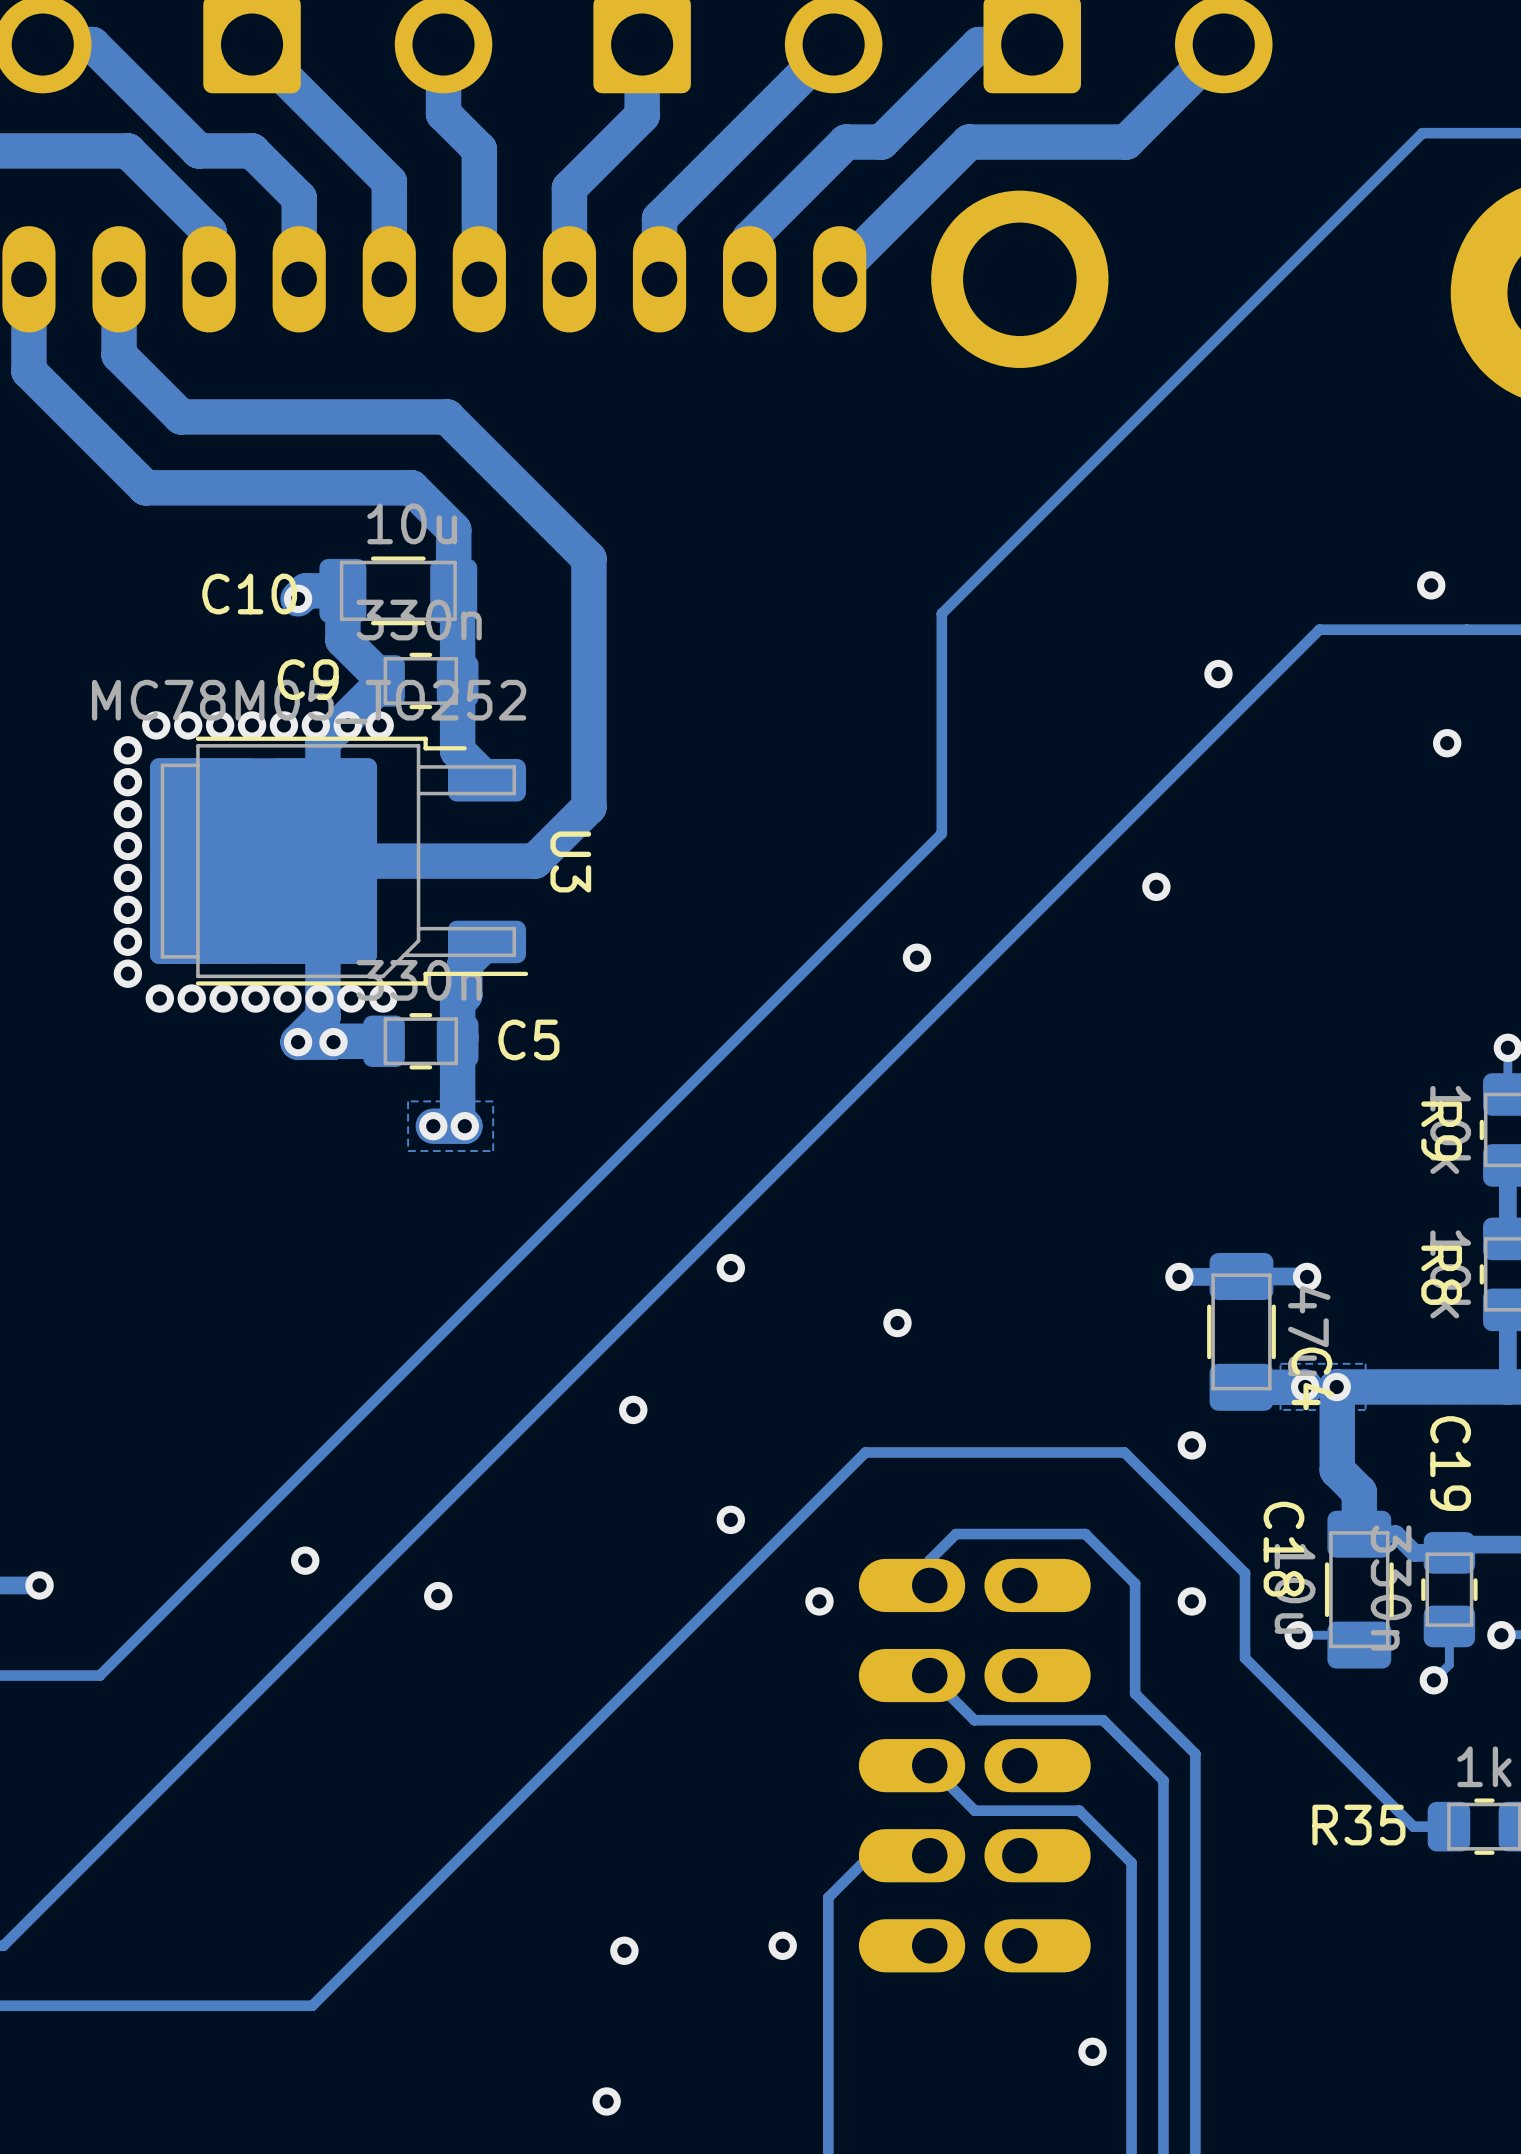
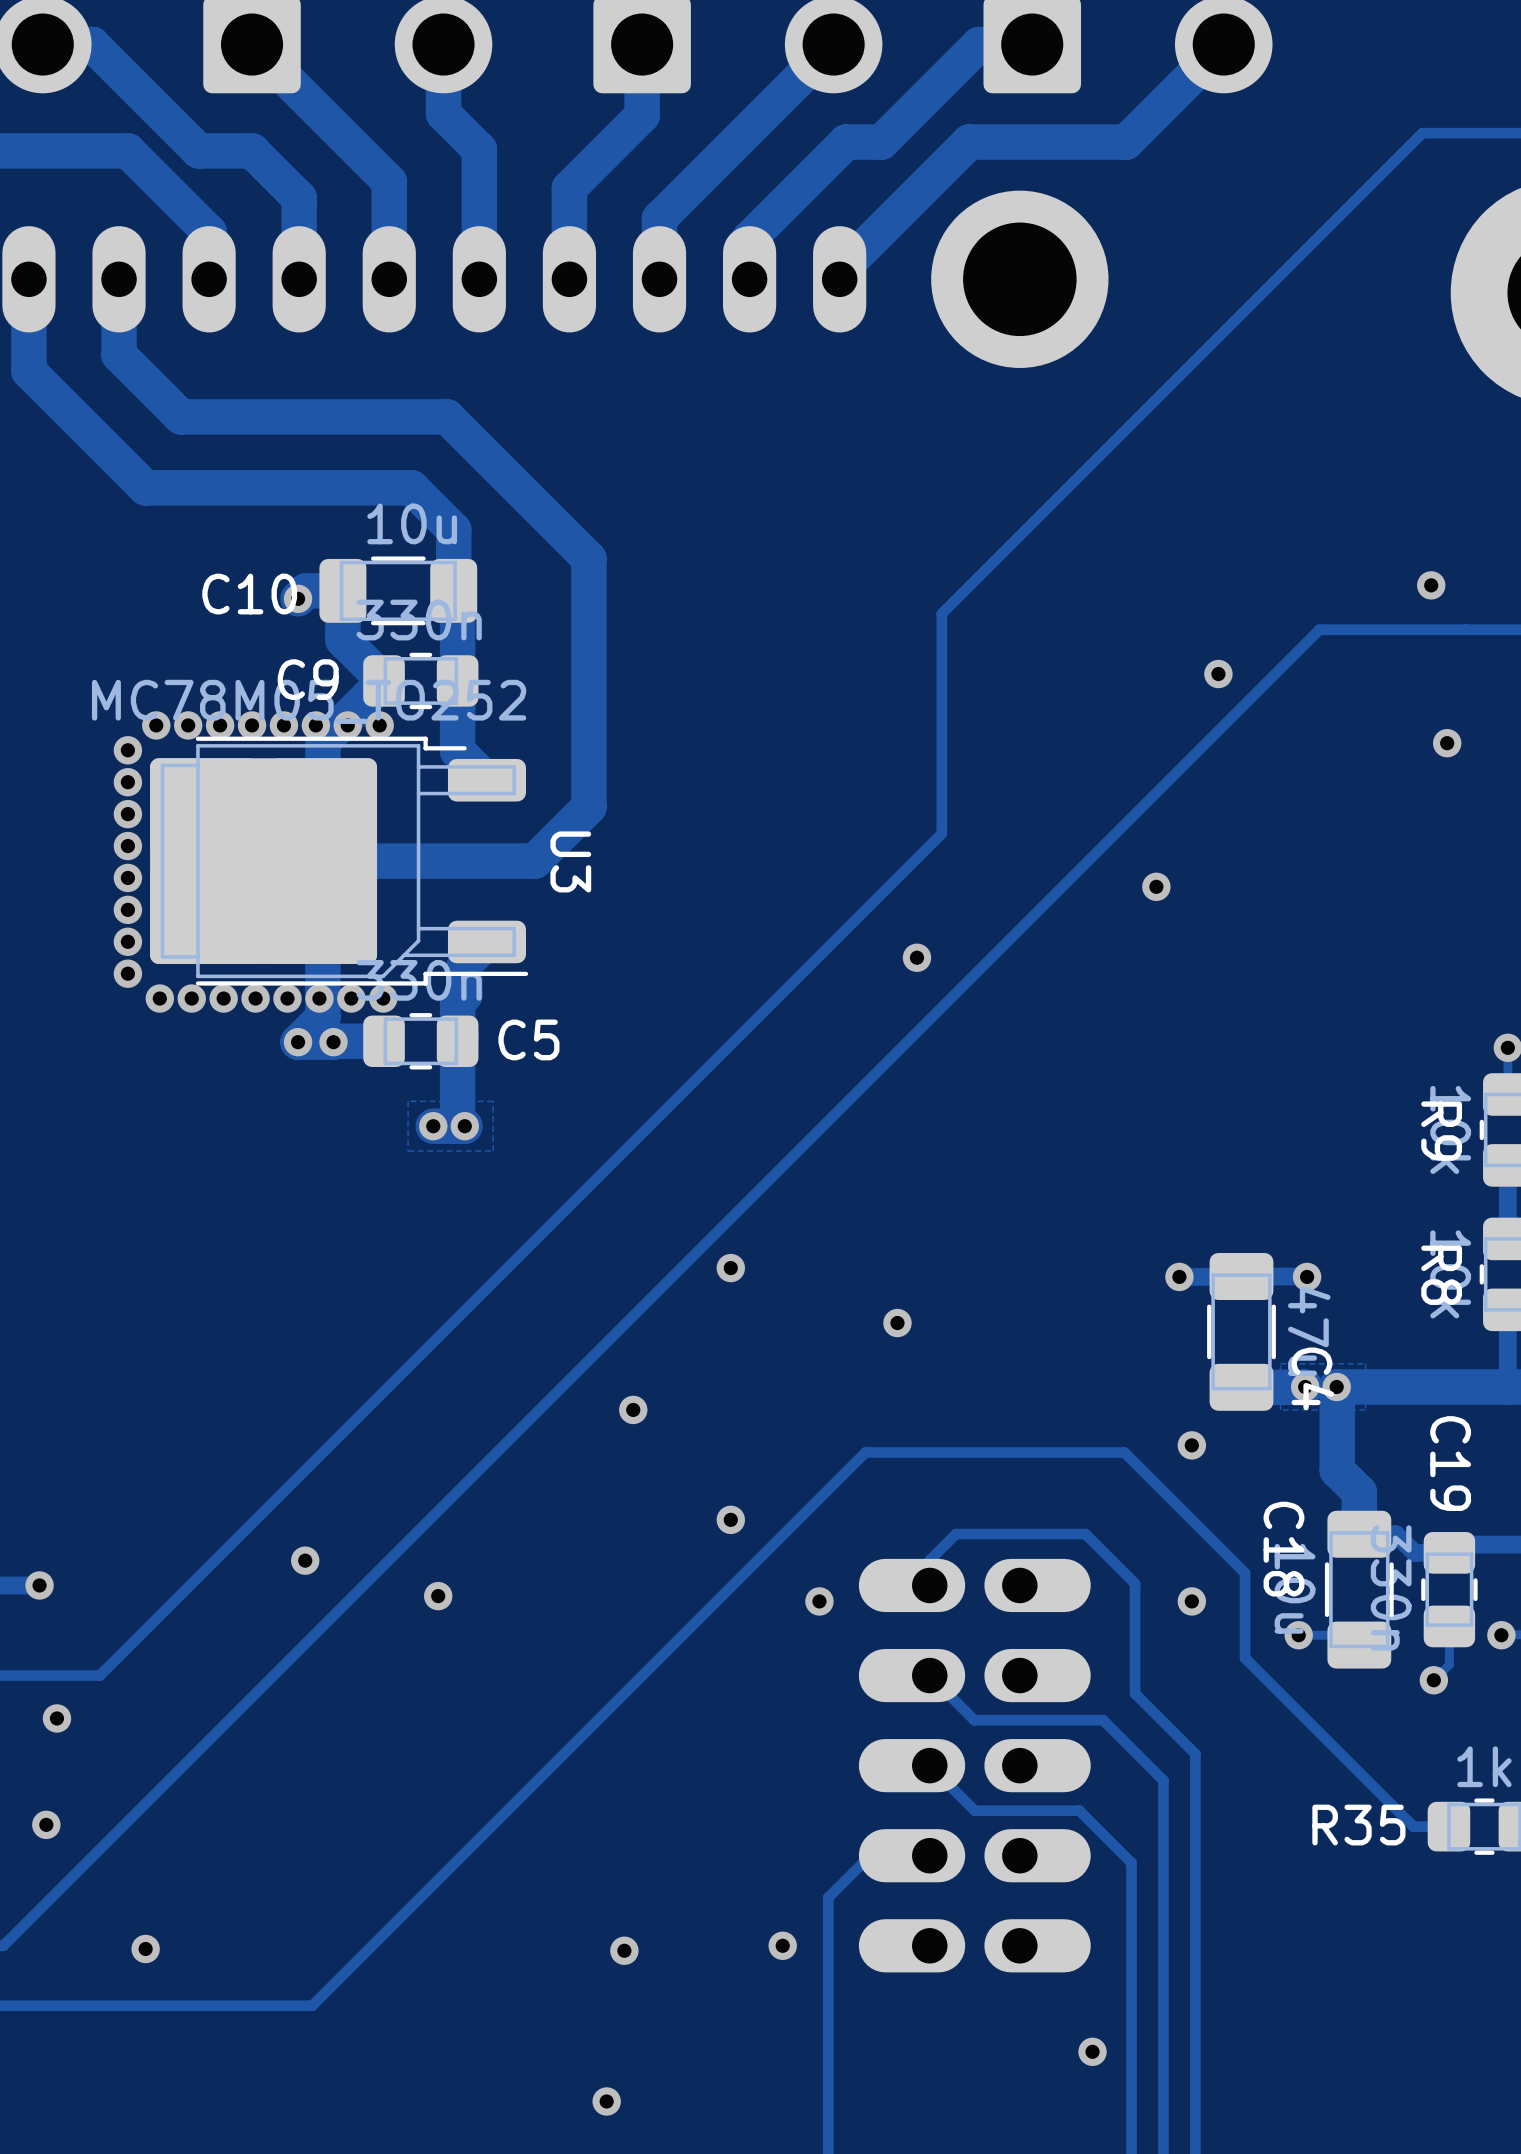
via: none -> (56, 1718)
via: none -> (46, 1824)
via: none -> (145, 1948)

